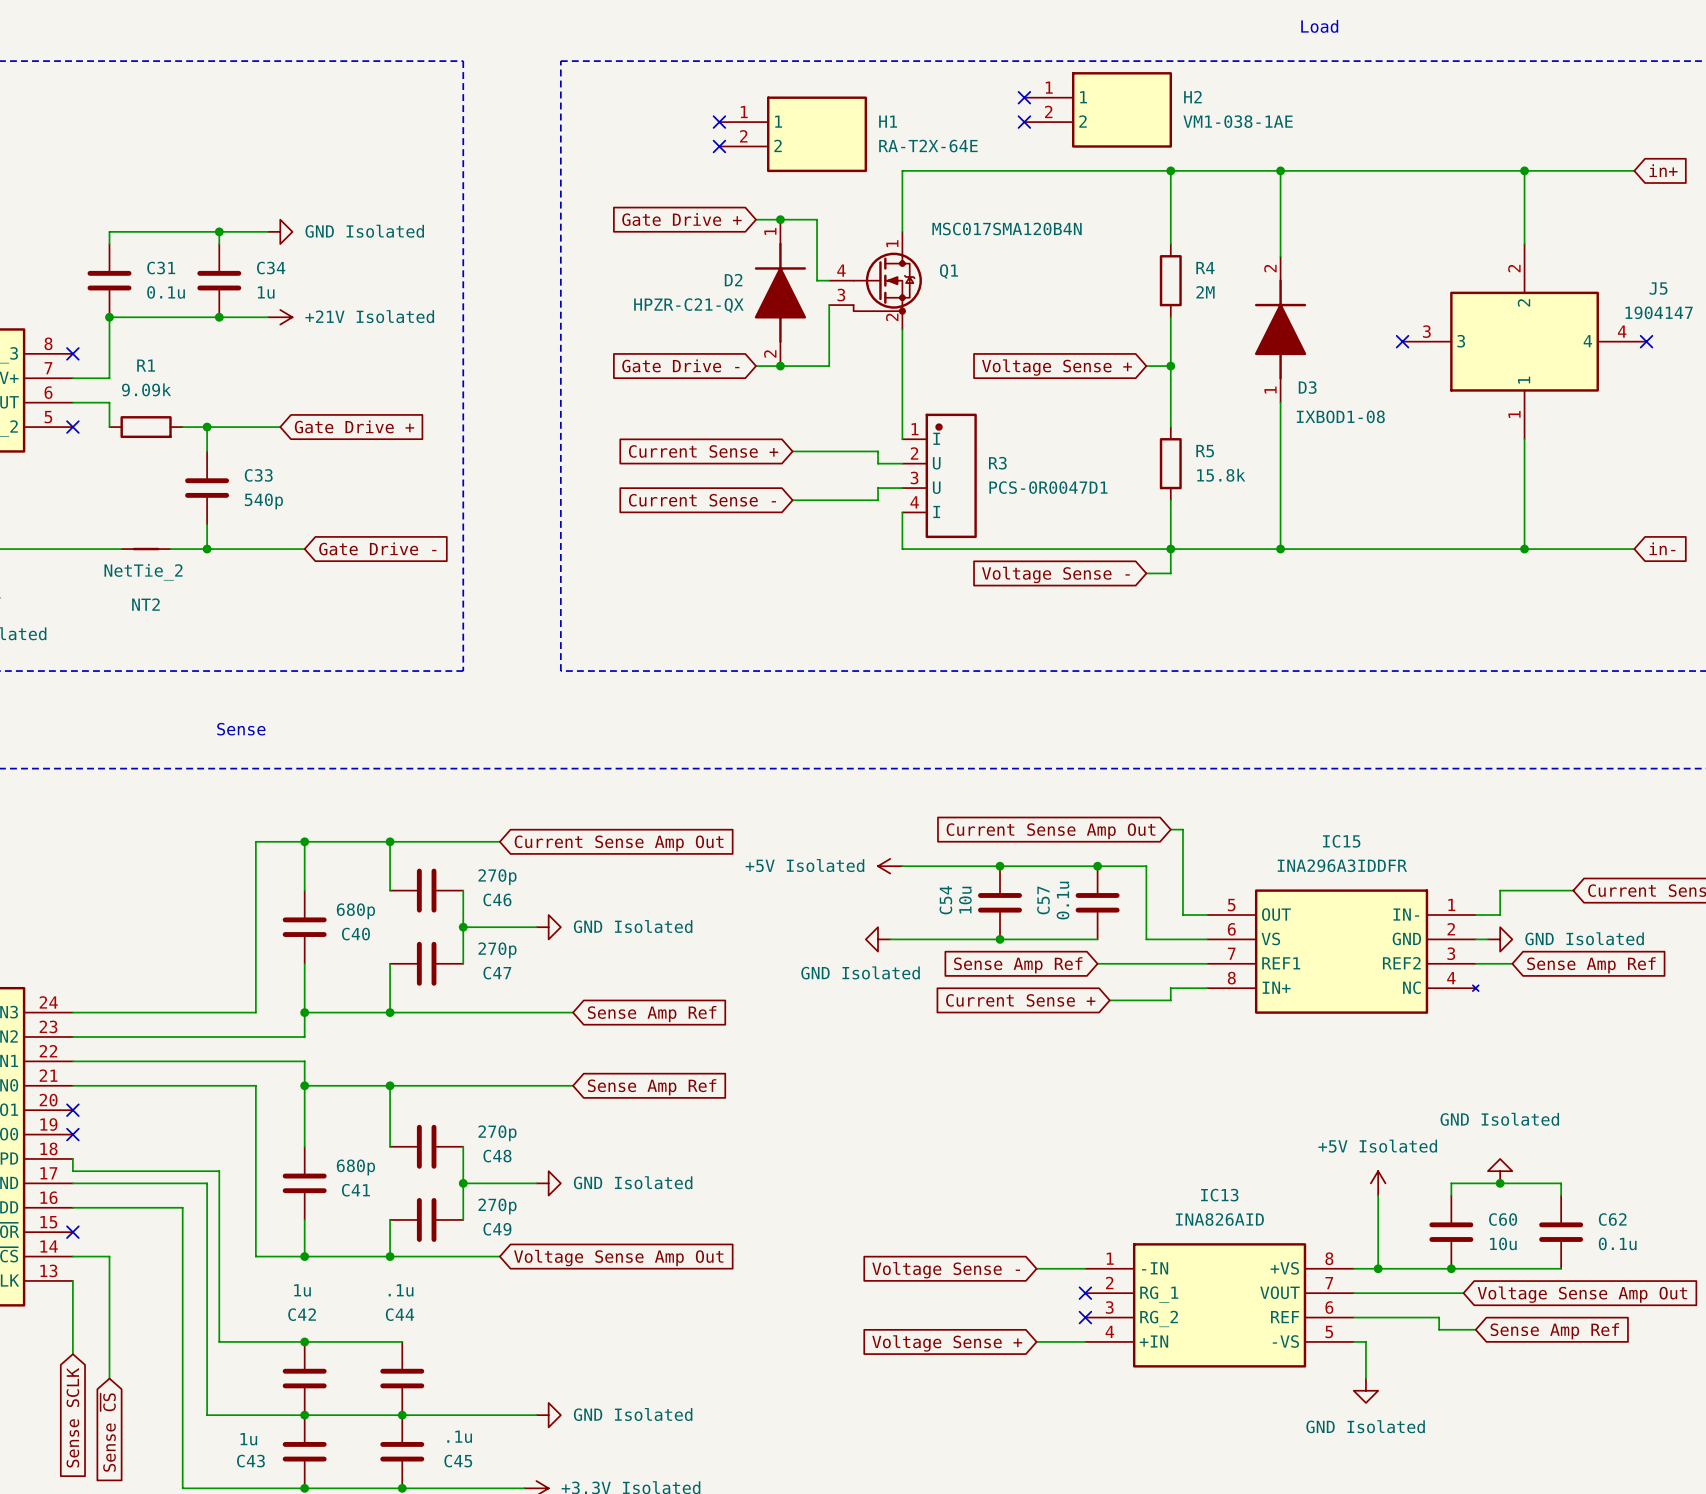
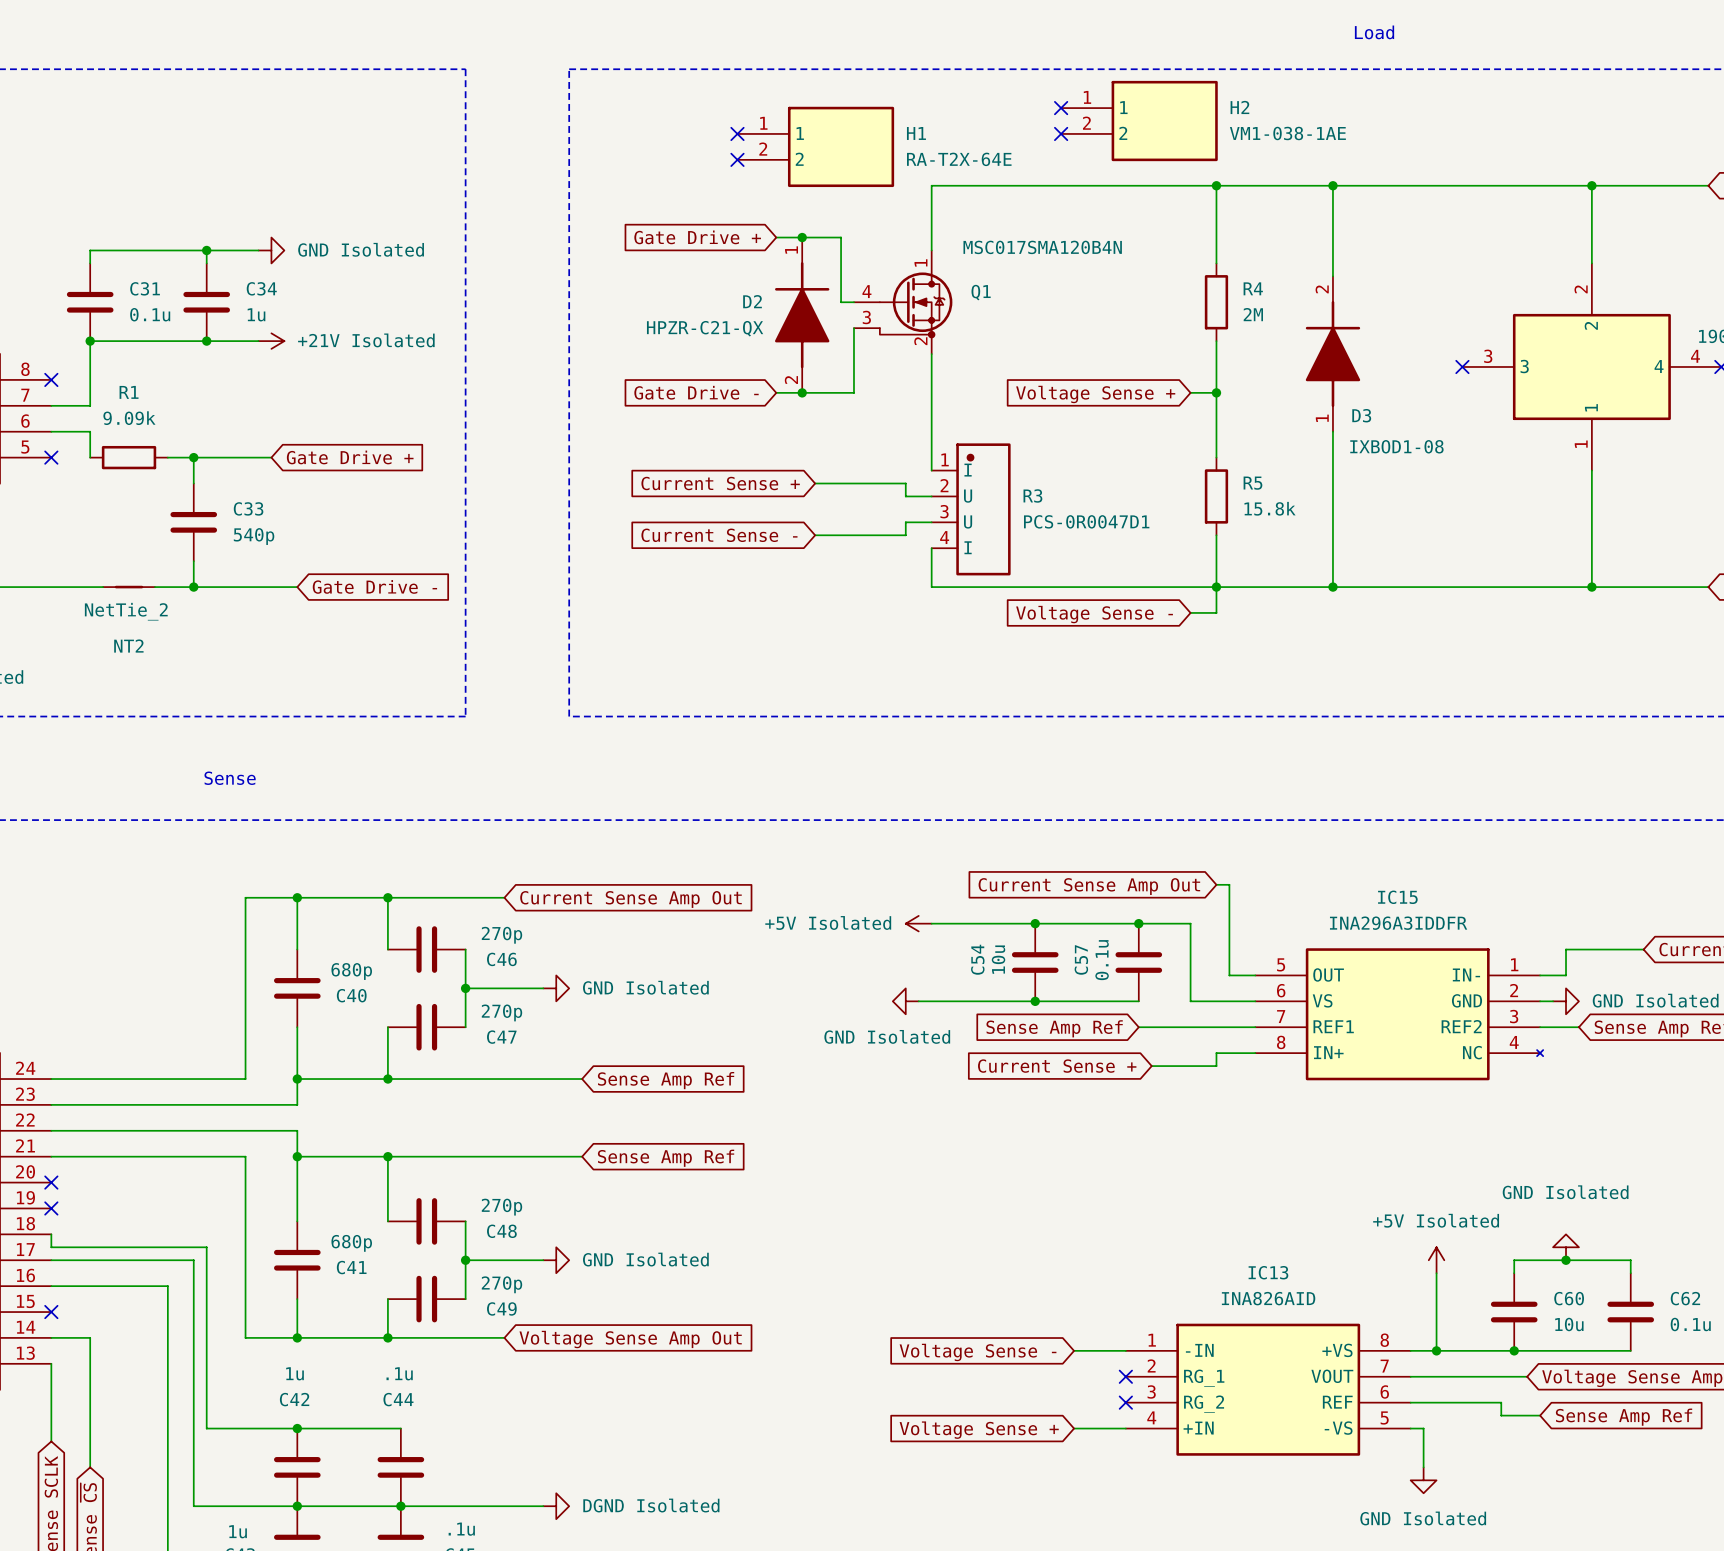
power symbol: GND Isolated (548, 1415) -> DGND Isolated (556, 1506)

